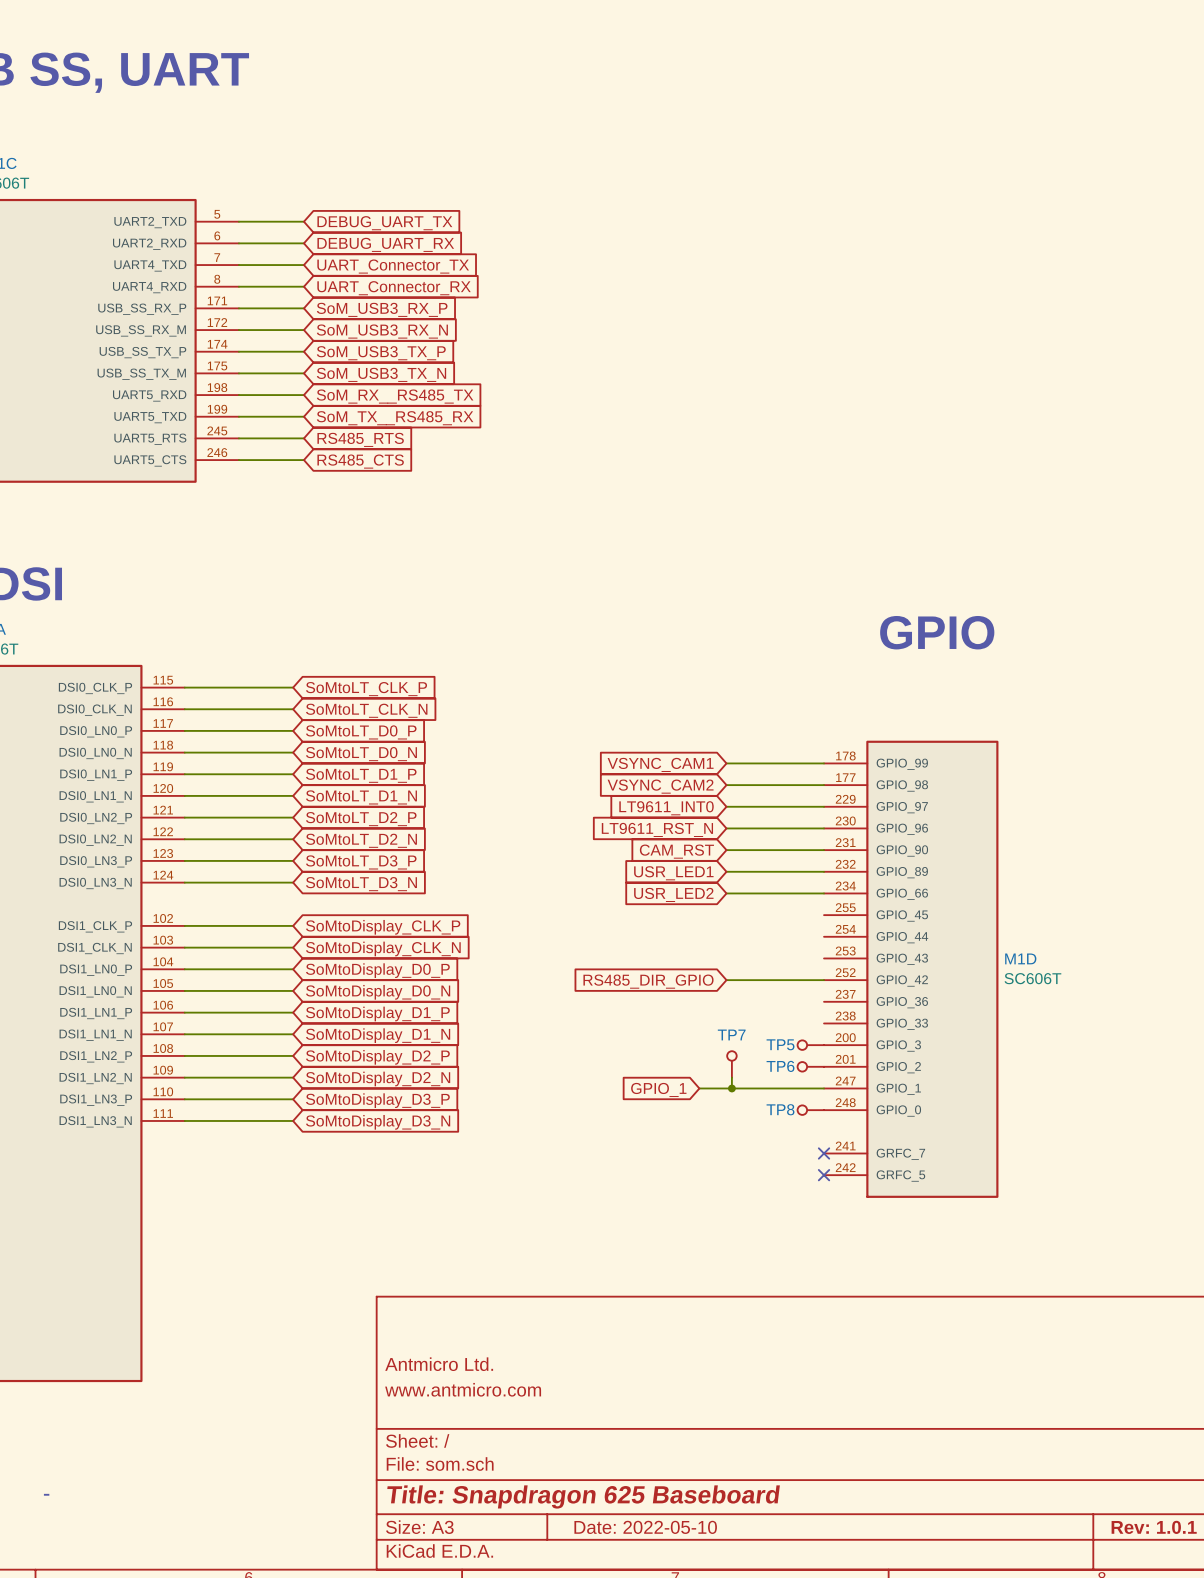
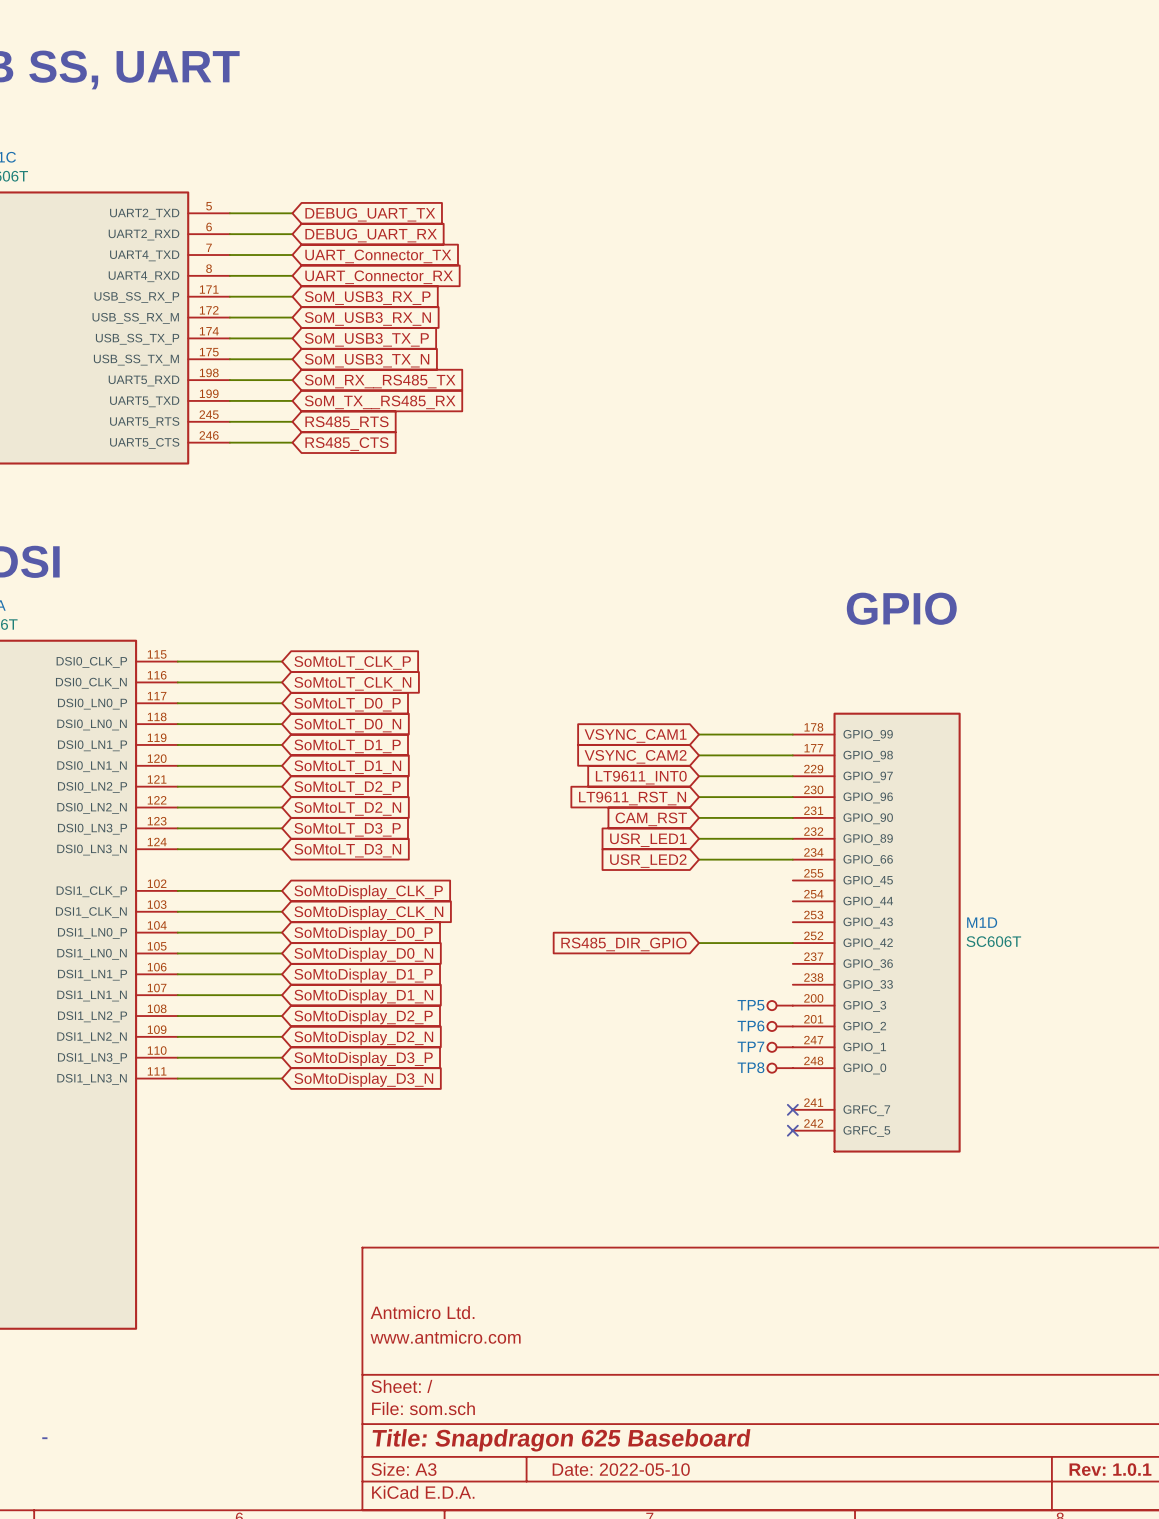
TP7 rotation: 0° (731, 1055) -> 90° counterclockwise (771, 1047)
TP7 position: (731, 1064) -> (780, 1047)
wire: (731, 1077) (731, 1088) -> none
wire: (699, 1088) (824, 1088) -> none
junction: (731, 1088) -> none
global label: GPIO_1 (658, 1089) -> none

